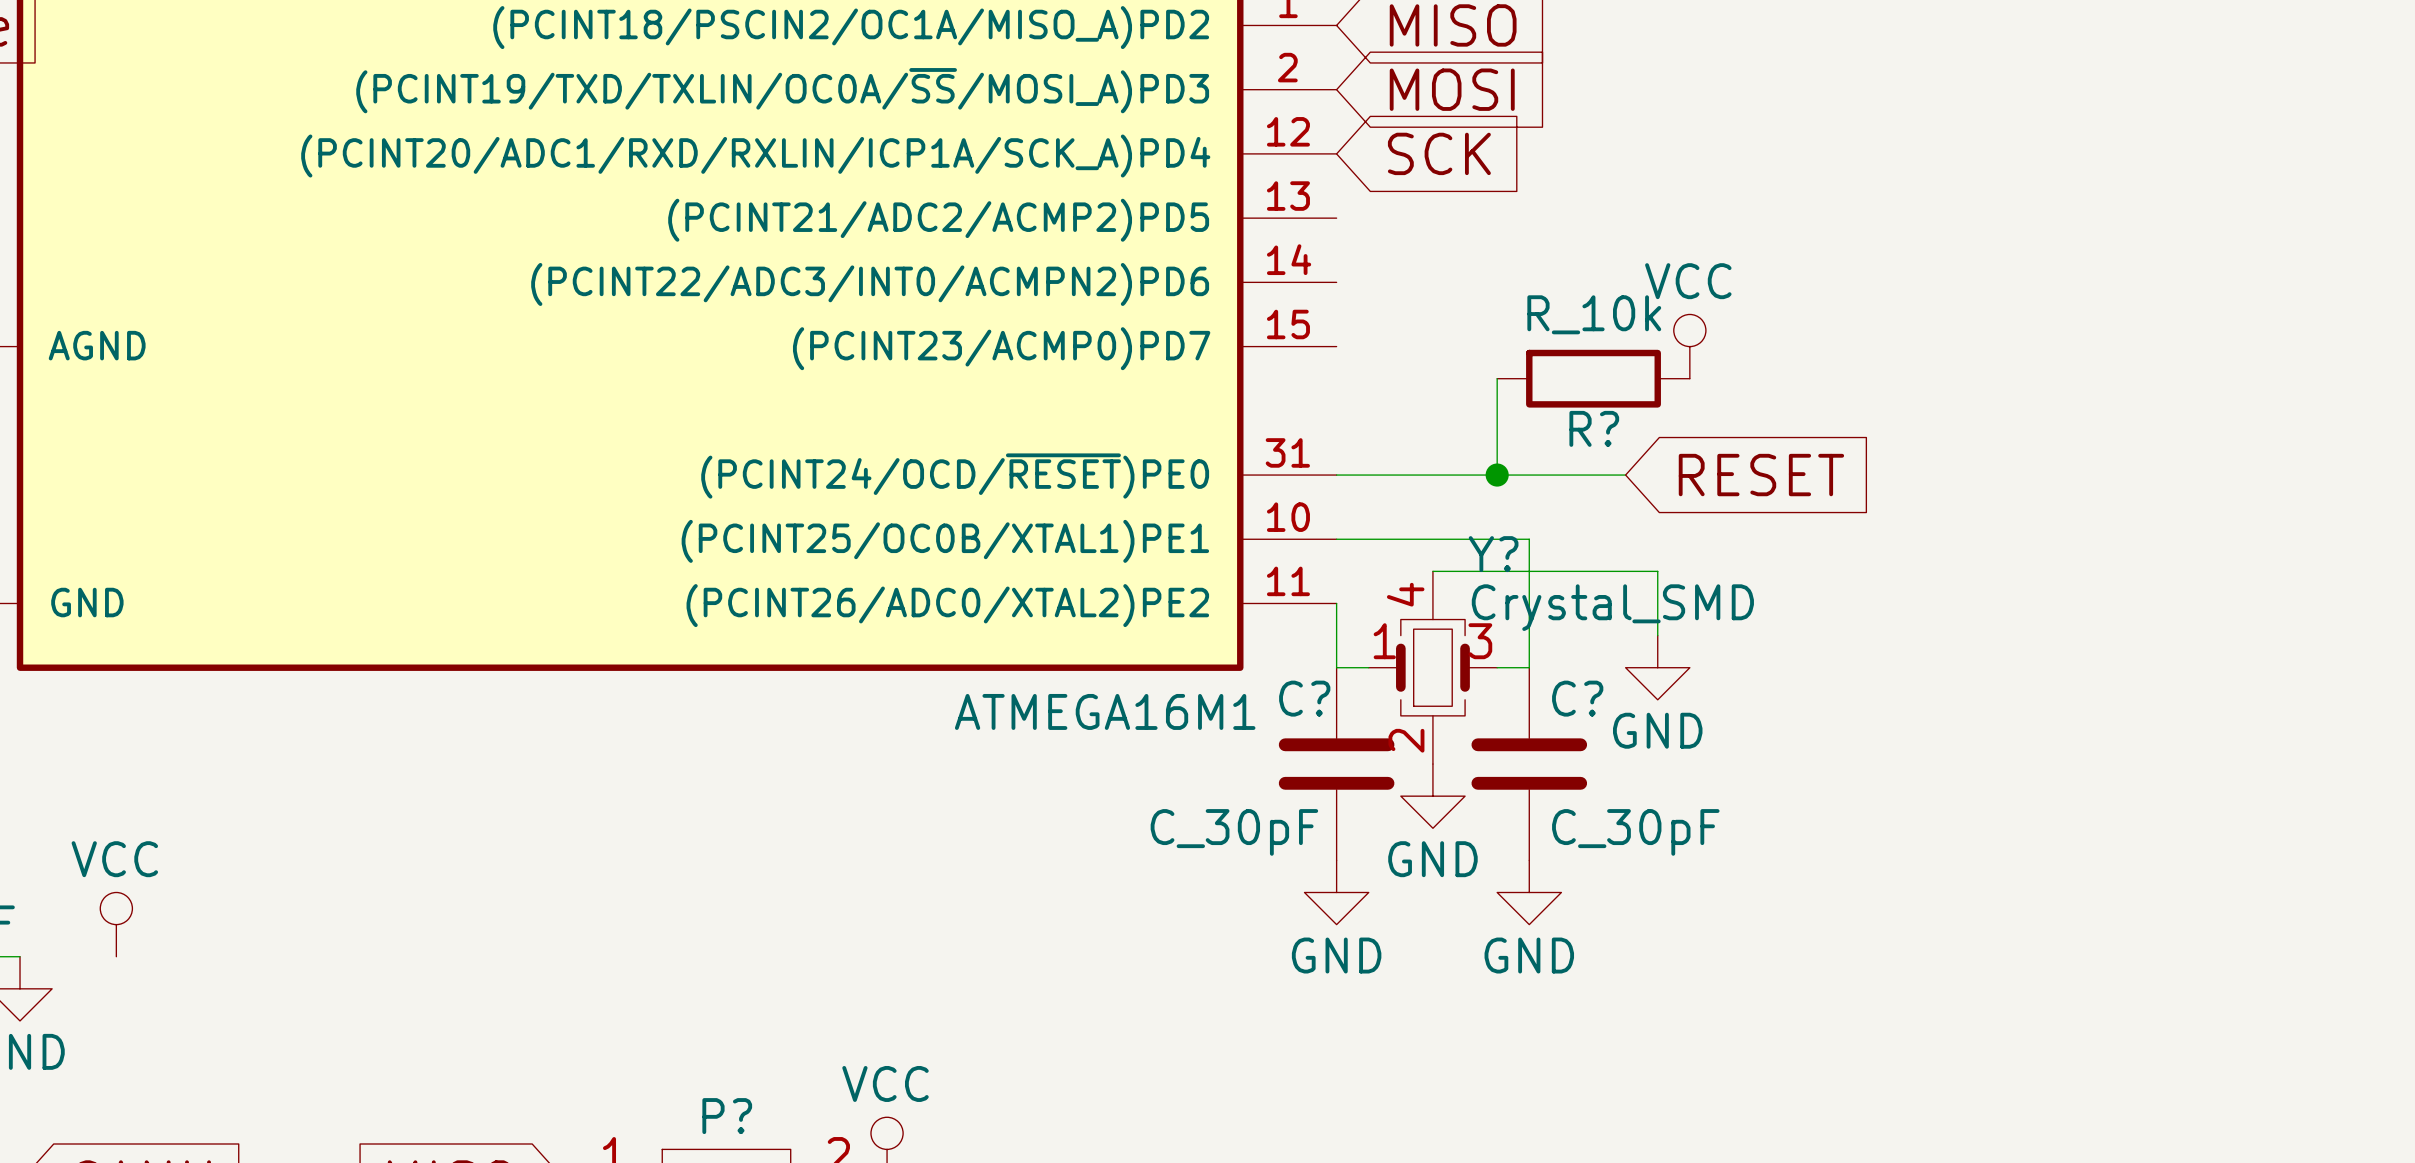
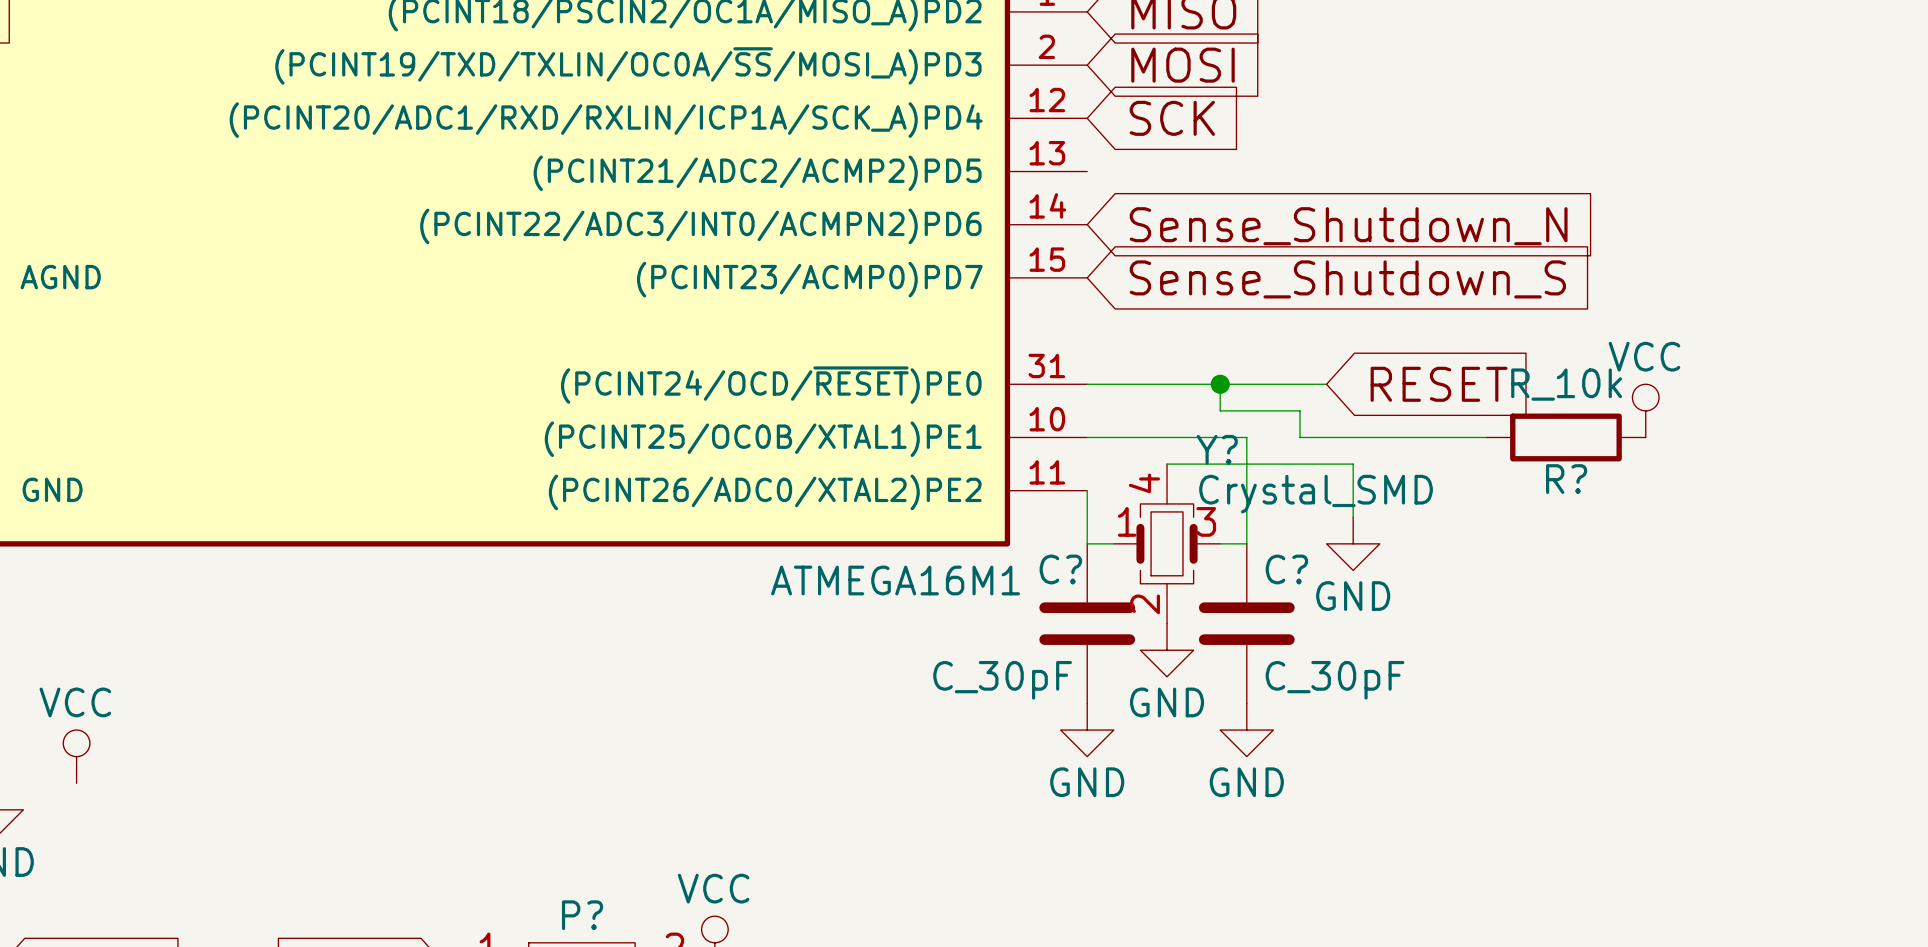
global label: none -> Sense_Shutdown_N (1348, 226)
power symbol position: VCC (1689, 346) -> VCC (1645, 410)
global label: none -> Sense_Shutdown_S (1347, 279)
wire: (1497, 378) (1497, 475) -> (1486, 437) (1300, 437) (1300, 410) (1220, 410) (1220, 384)
R? position: (1593, 378) -> (1565, 437)

